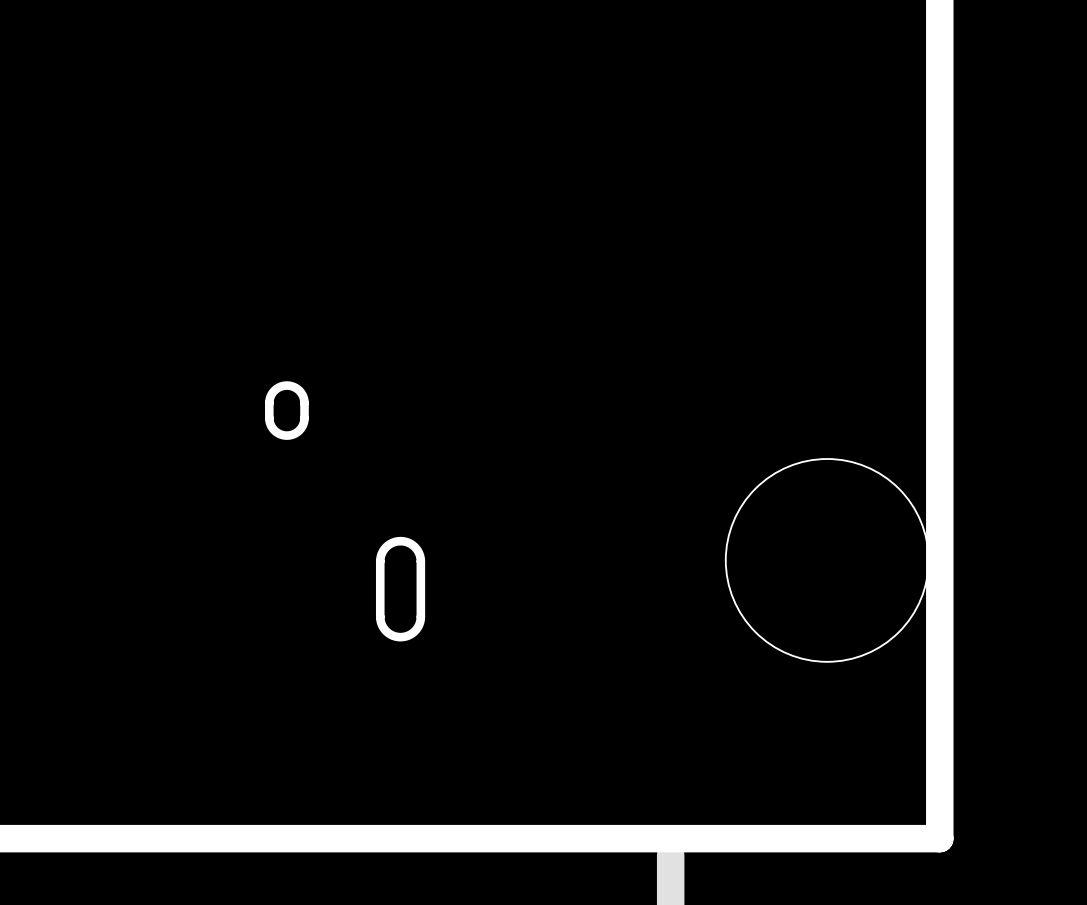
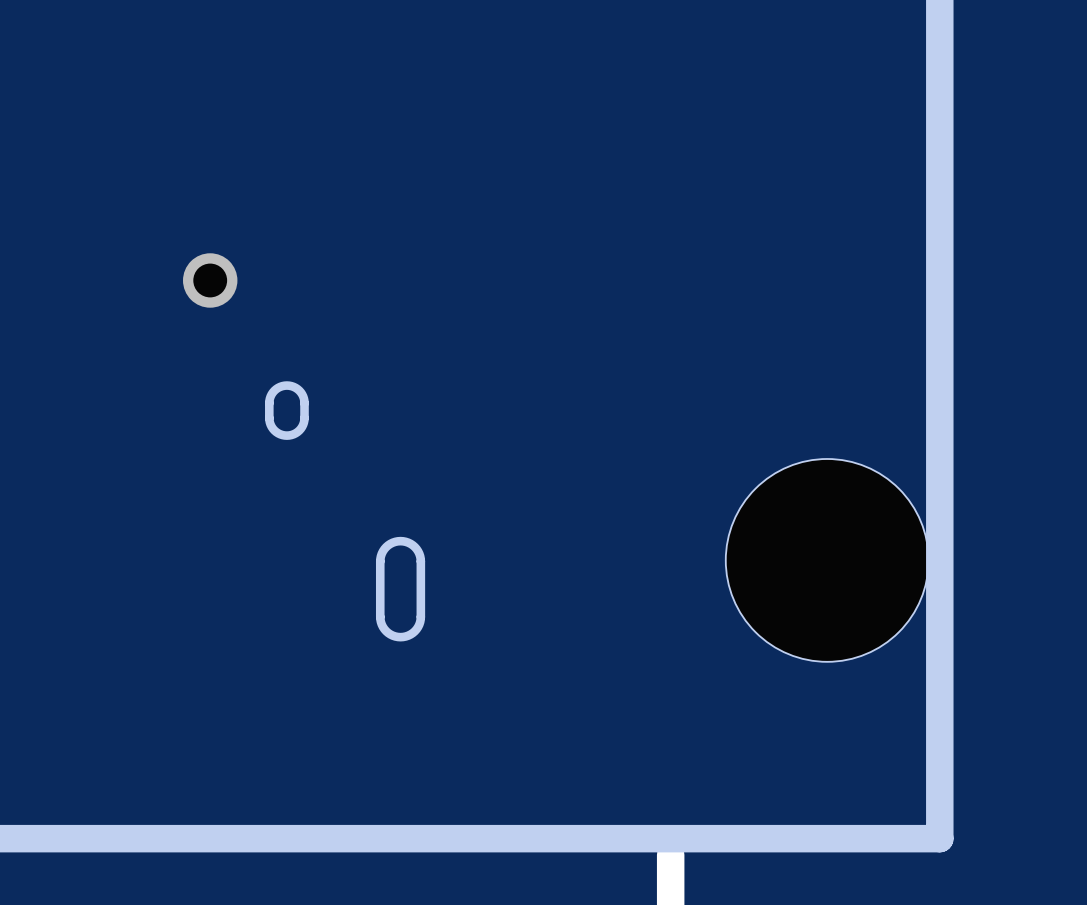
via: none -> (210, 280)

